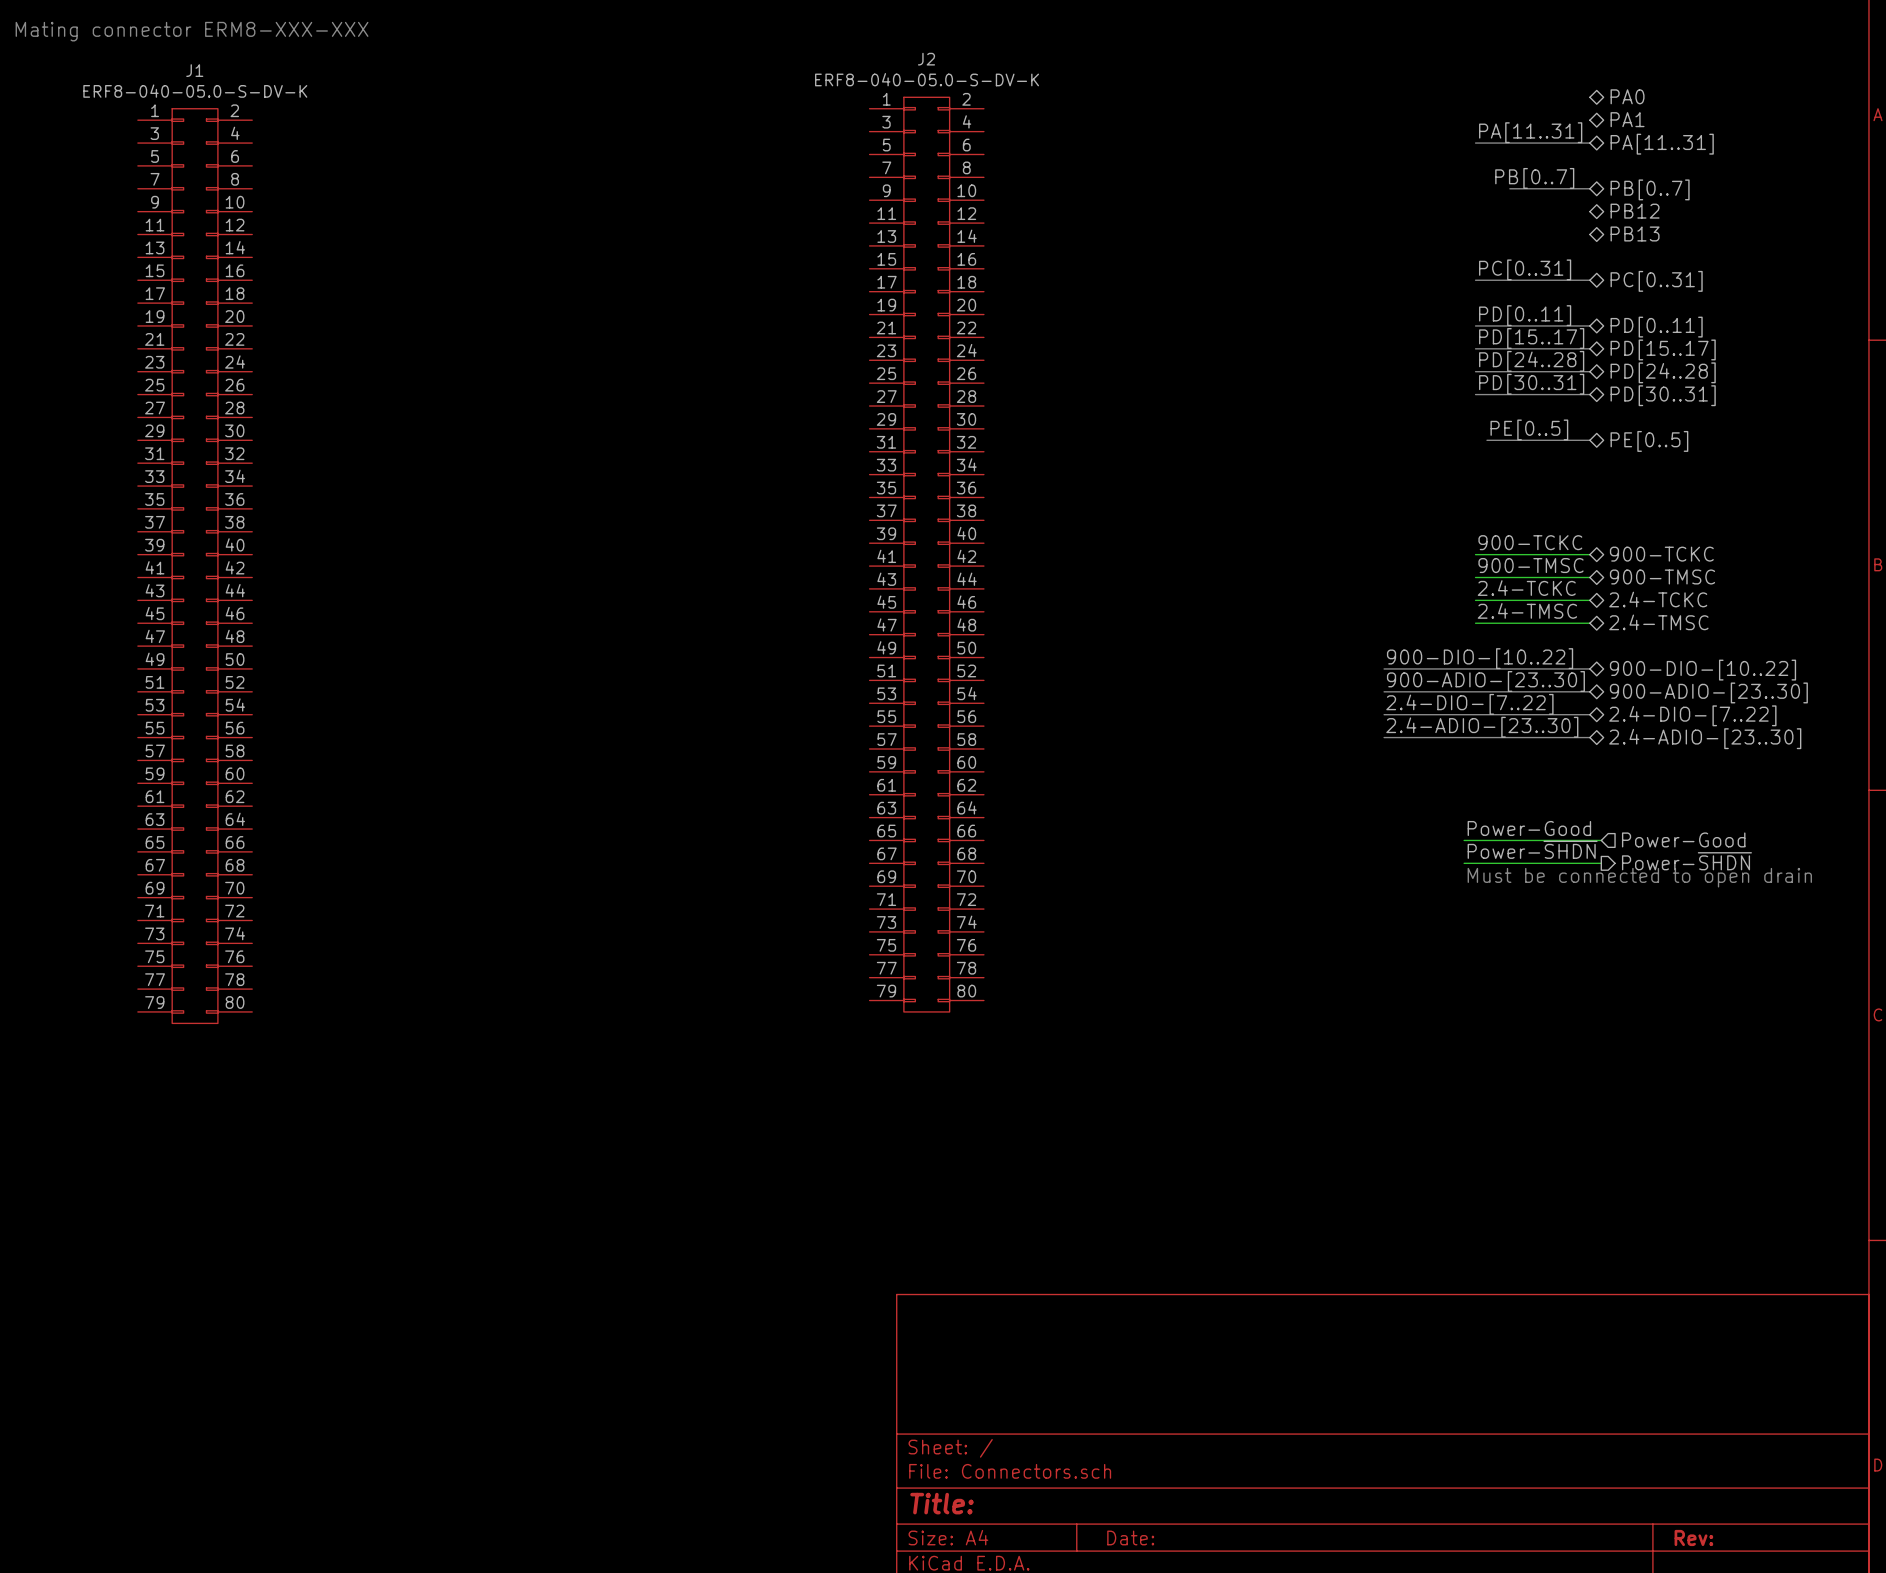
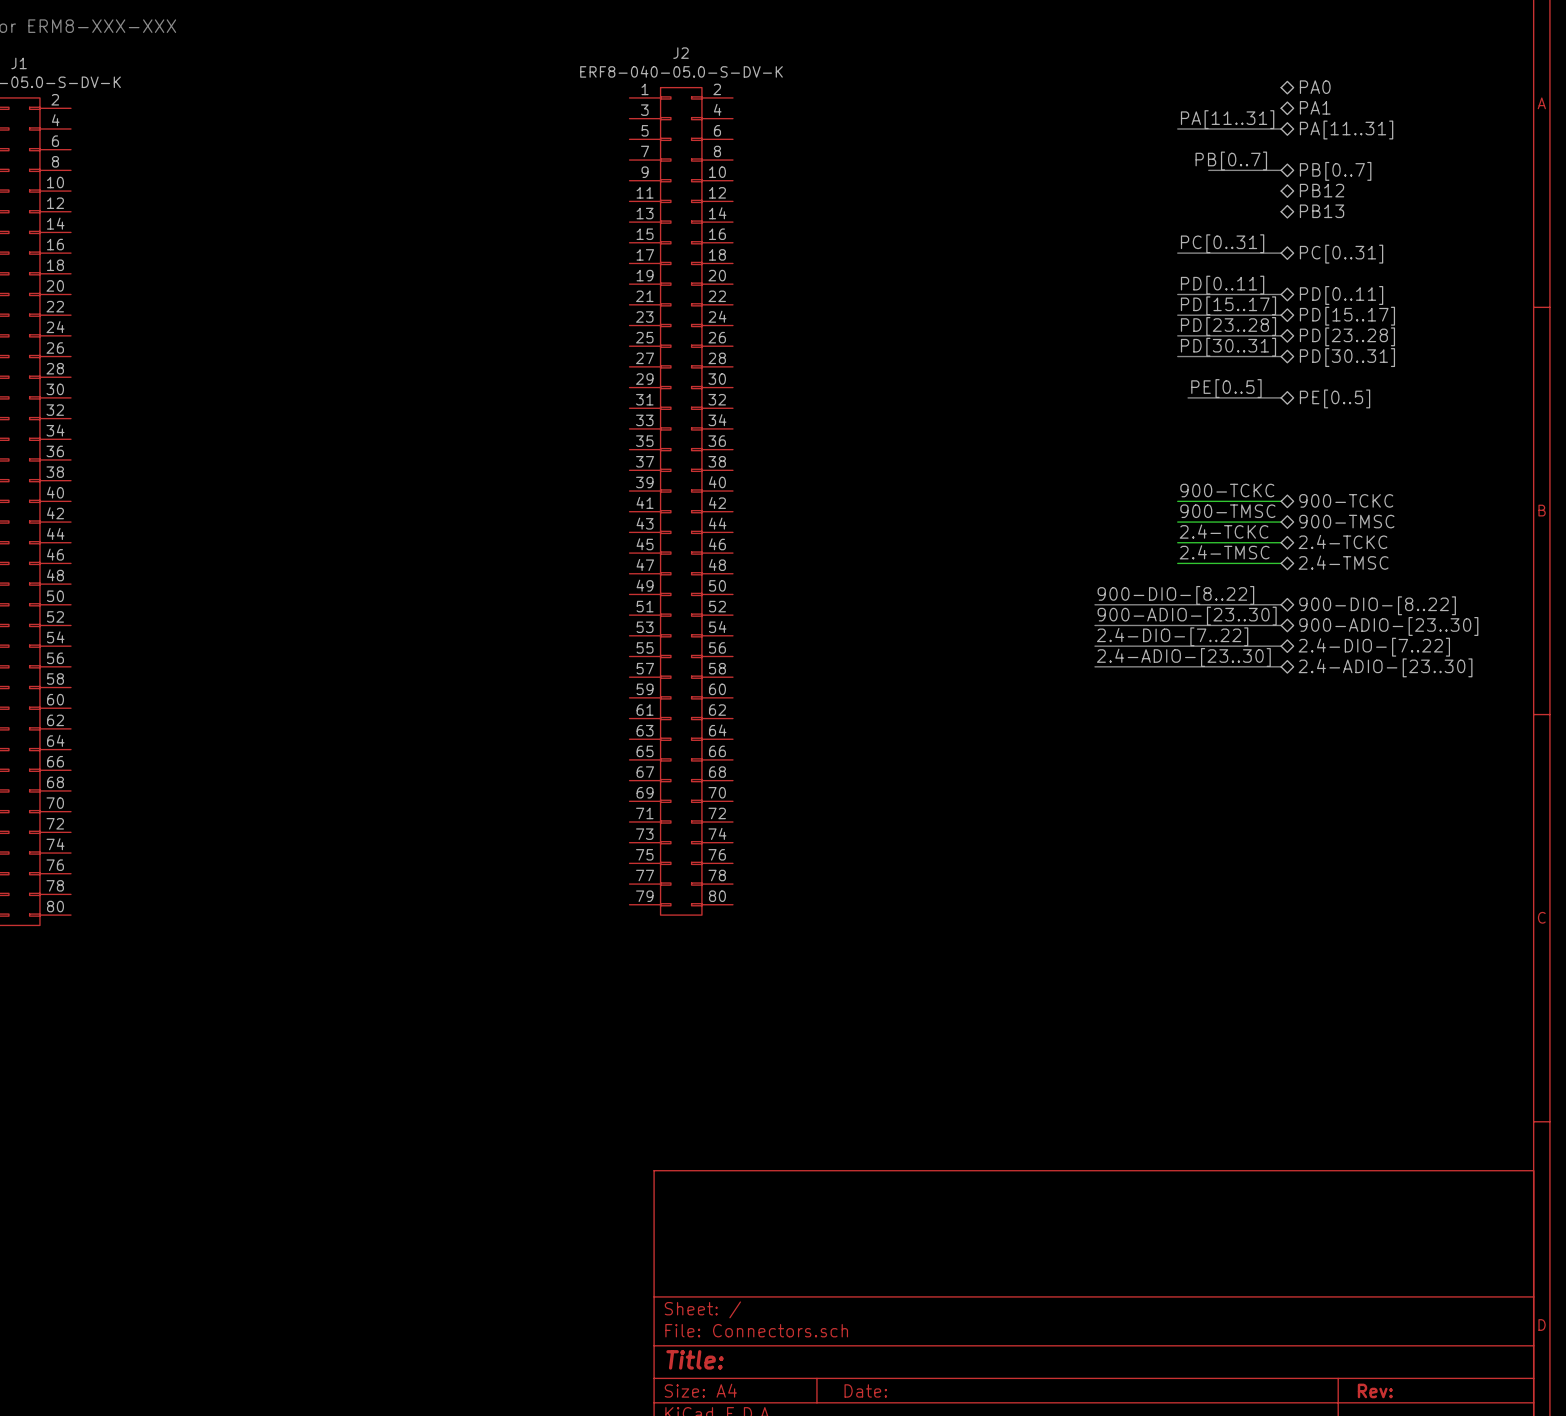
label: PD[24..28] (1531, 361) -> PD[23..28] (1228, 326)
hierarchical label: PD[24..28] (1663, 372) -> PD[23..28] (1347, 336)
label: 900-DIO-[10..22] (1480, 658) -> 900-DIO-[8..22] (1175, 595)
hierarchical label: 900-DIO-[10..22] (1702, 670) -> 900-DIO-[8..22] (1377, 605)
label: Power-Good (1529, 828) -> none
hierarchical label: Power-Good (1683, 839) -> none
wire: (1464, 840) (1601, 840) -> none
label: Power-~{SHDN} (1532, 849) -> none
hierarchical label: Power-~{SHDN} (1686, 861) -> none
wire: (1464, 863) (1601, 863) -> none
text: Must be connected to open drain (1639, 877) -> none

